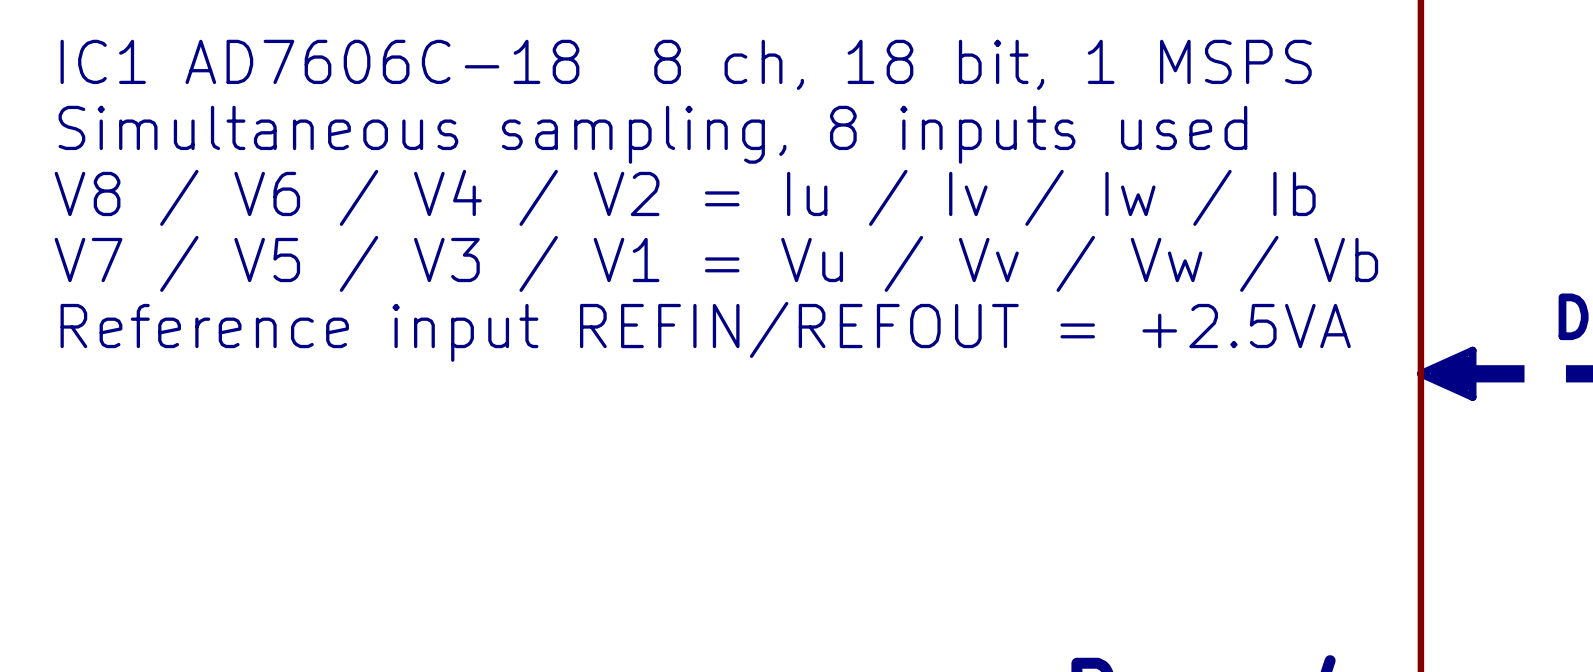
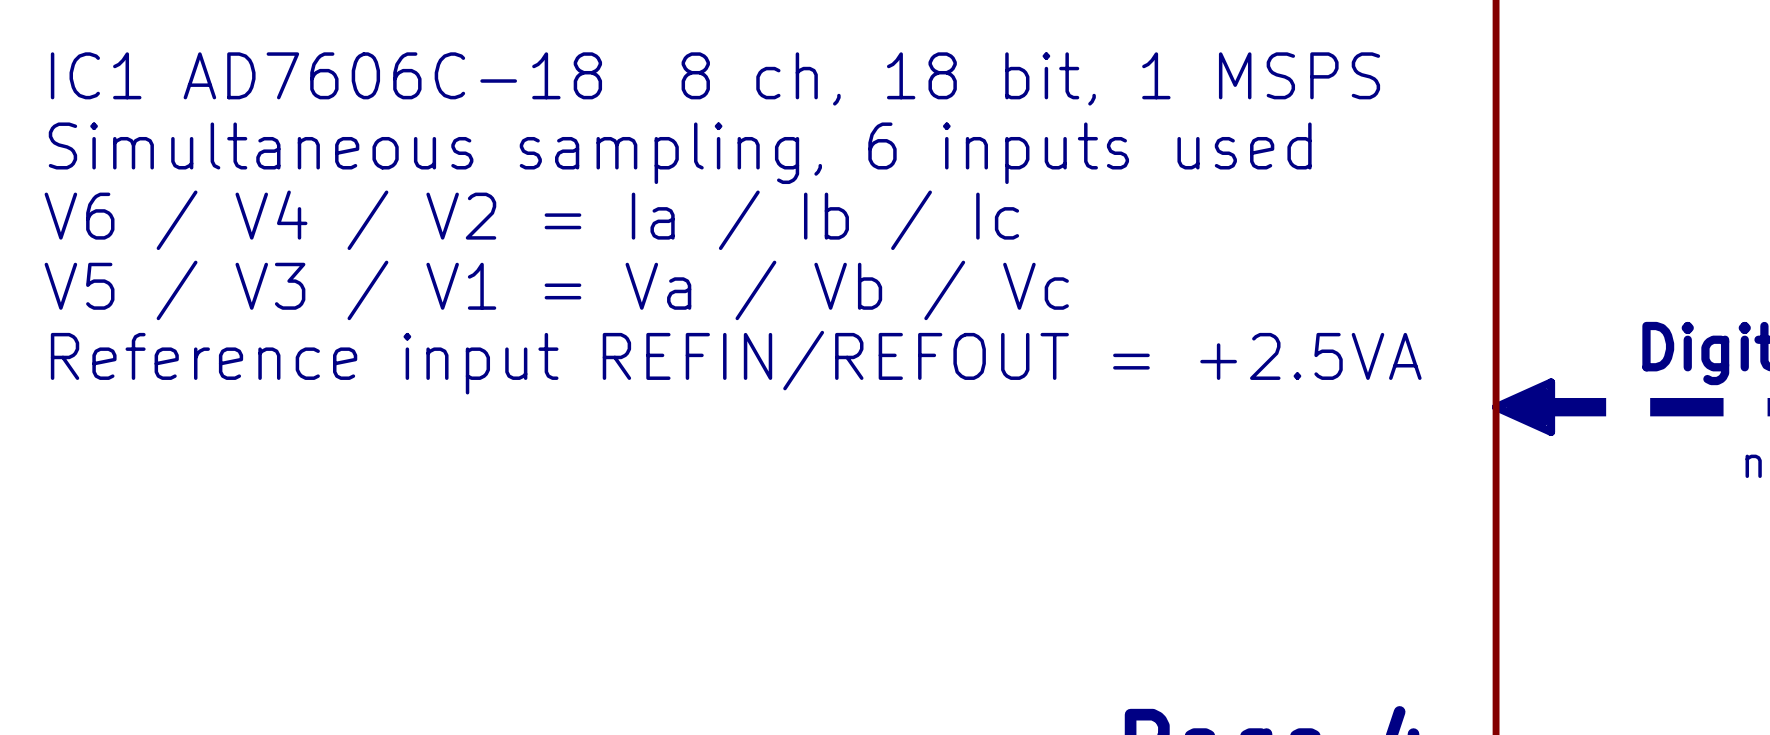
text: Simultaneous sampling, 8 inputs used (652, 134) -> Simultaneous sampling, 6 inputs used (680, 153)
text: V8 / V6 / V4 / V2 = Iu / Iv / Iw / Ib (685, 197) -> V6 / V4 / V2 = Ia / Ib / Ic (531, 220)
text: V7 / V5 / V3 / V1 = Vu / Vv / Vw / Vb (716, 263) -> V5 / V3 / V1 = Va / Vb / Vc (556, 290)

